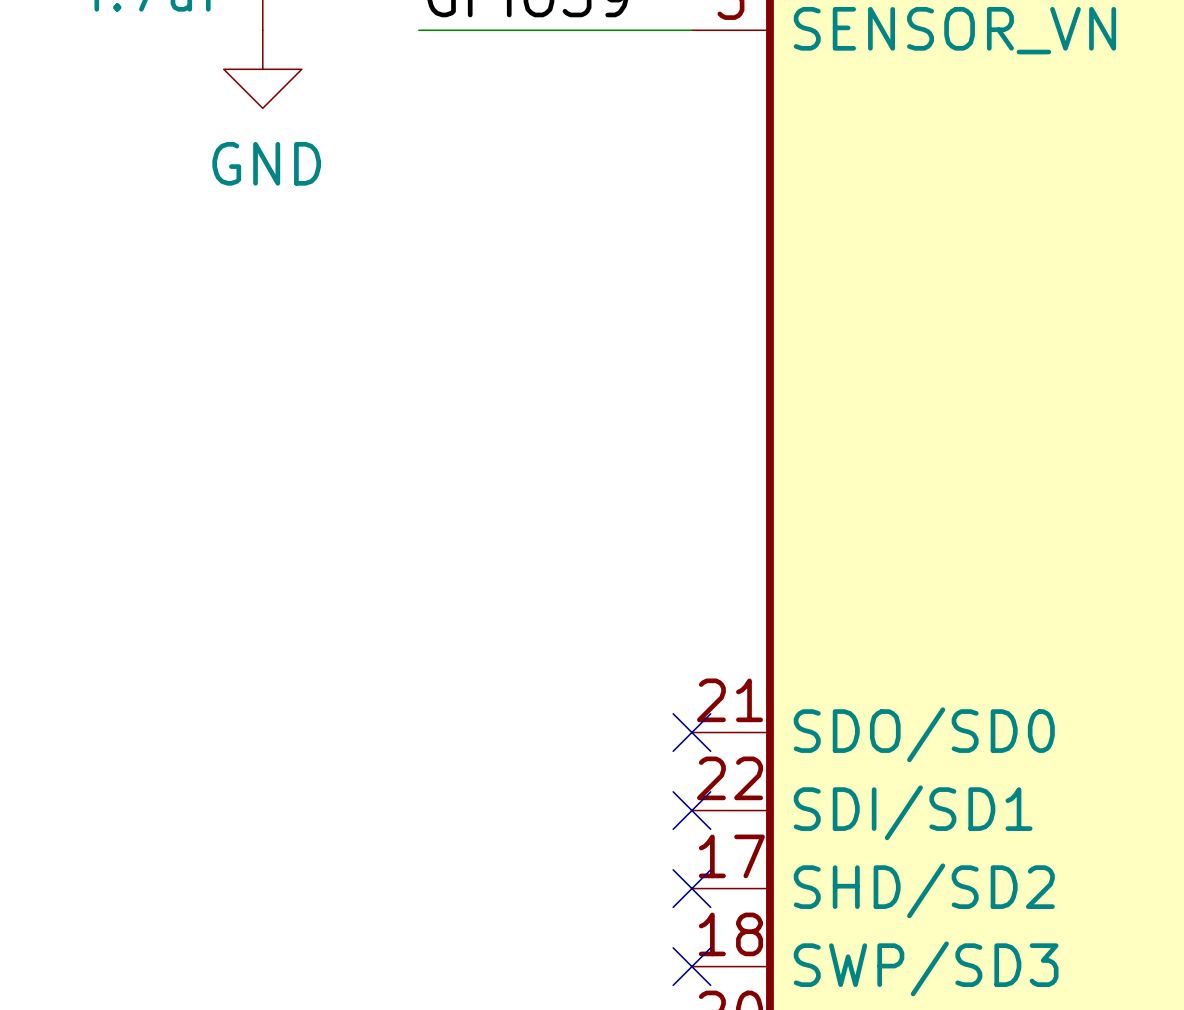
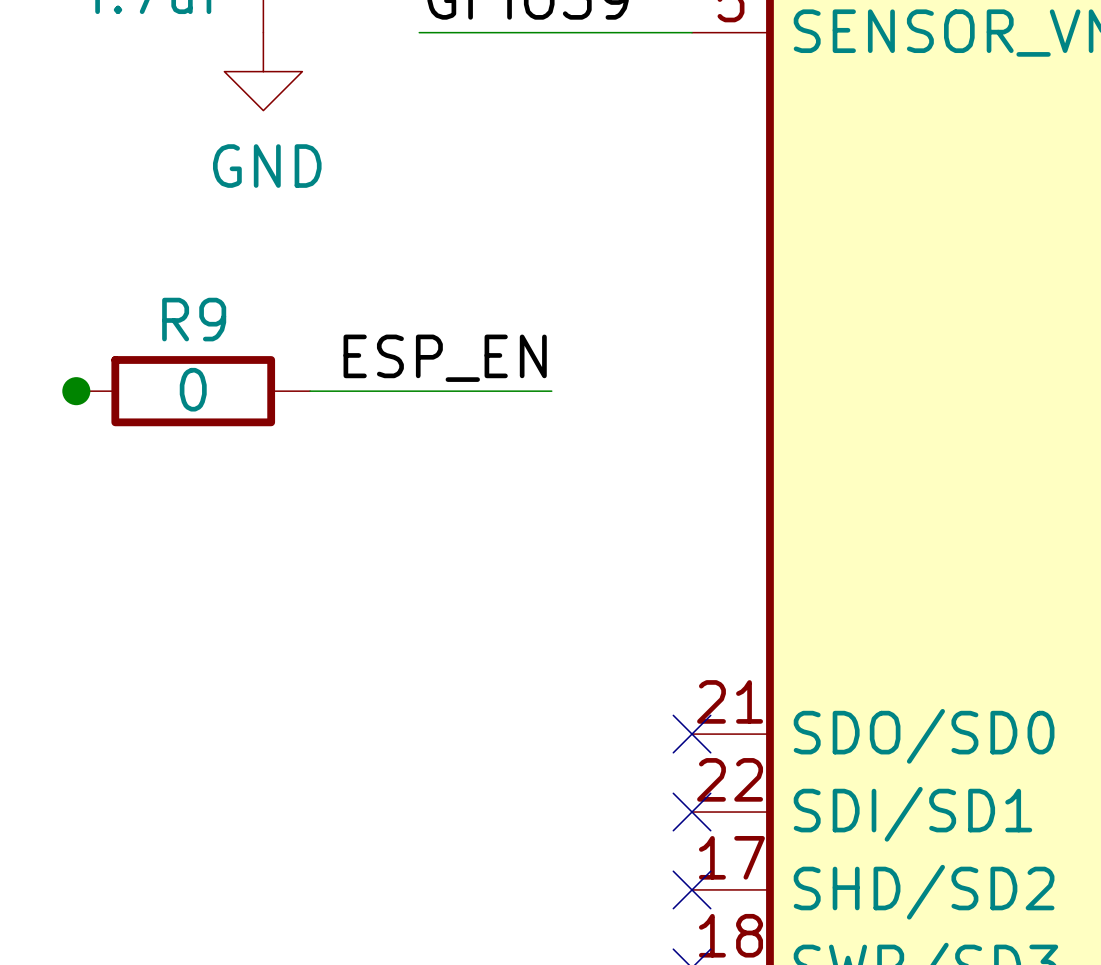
label: none -> ESP_EN (445, 358)
junction: none -> (76, 391)
R9: none -> 0 (193, 391)
wire: none -> (310, 391) (551, 391)

